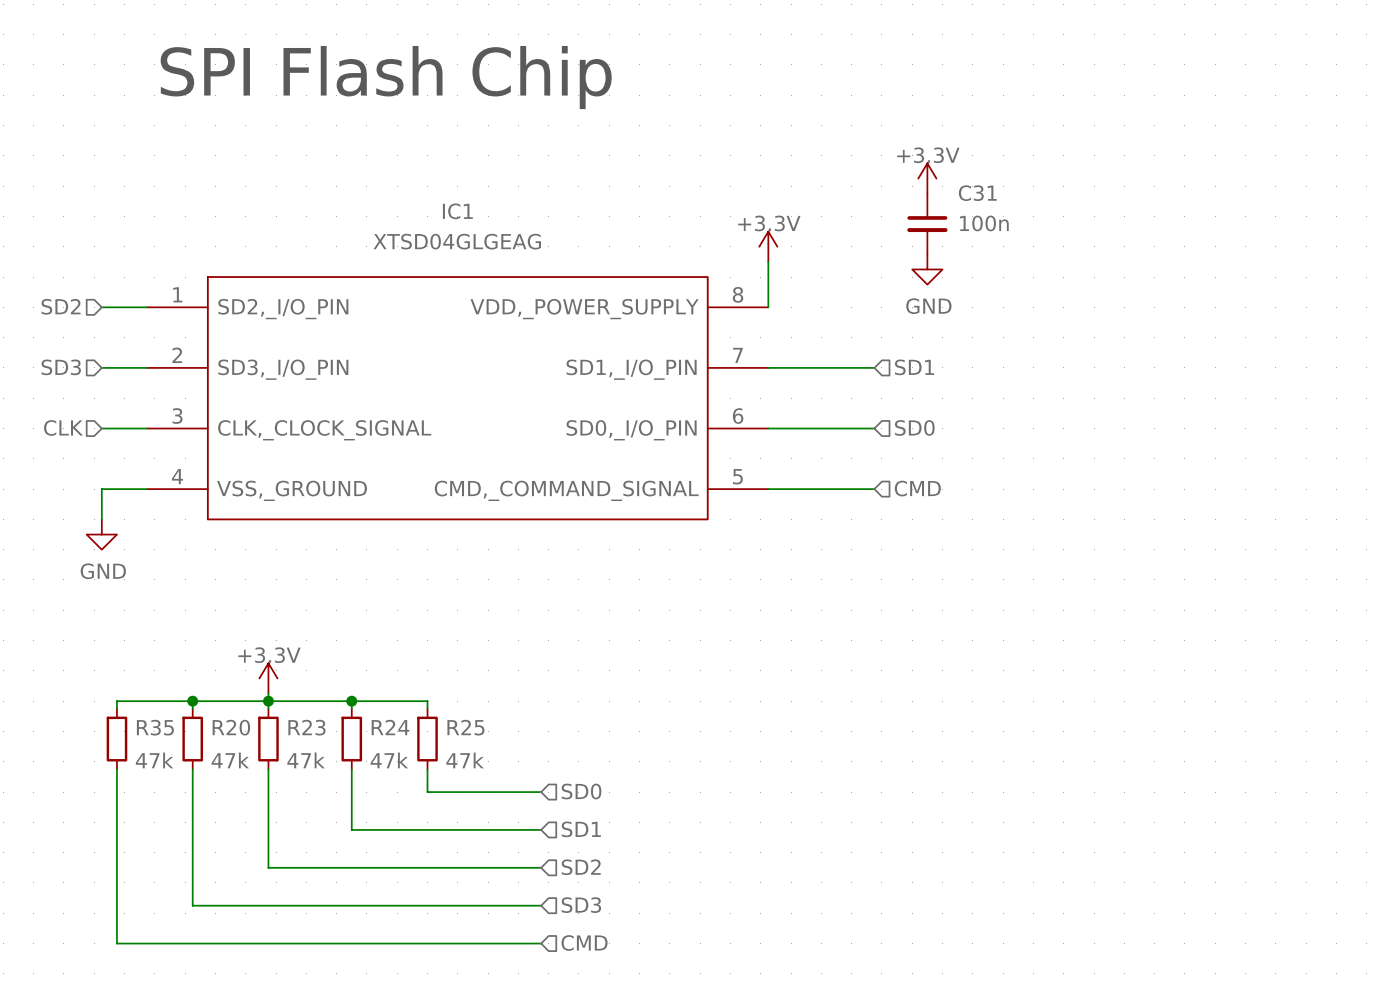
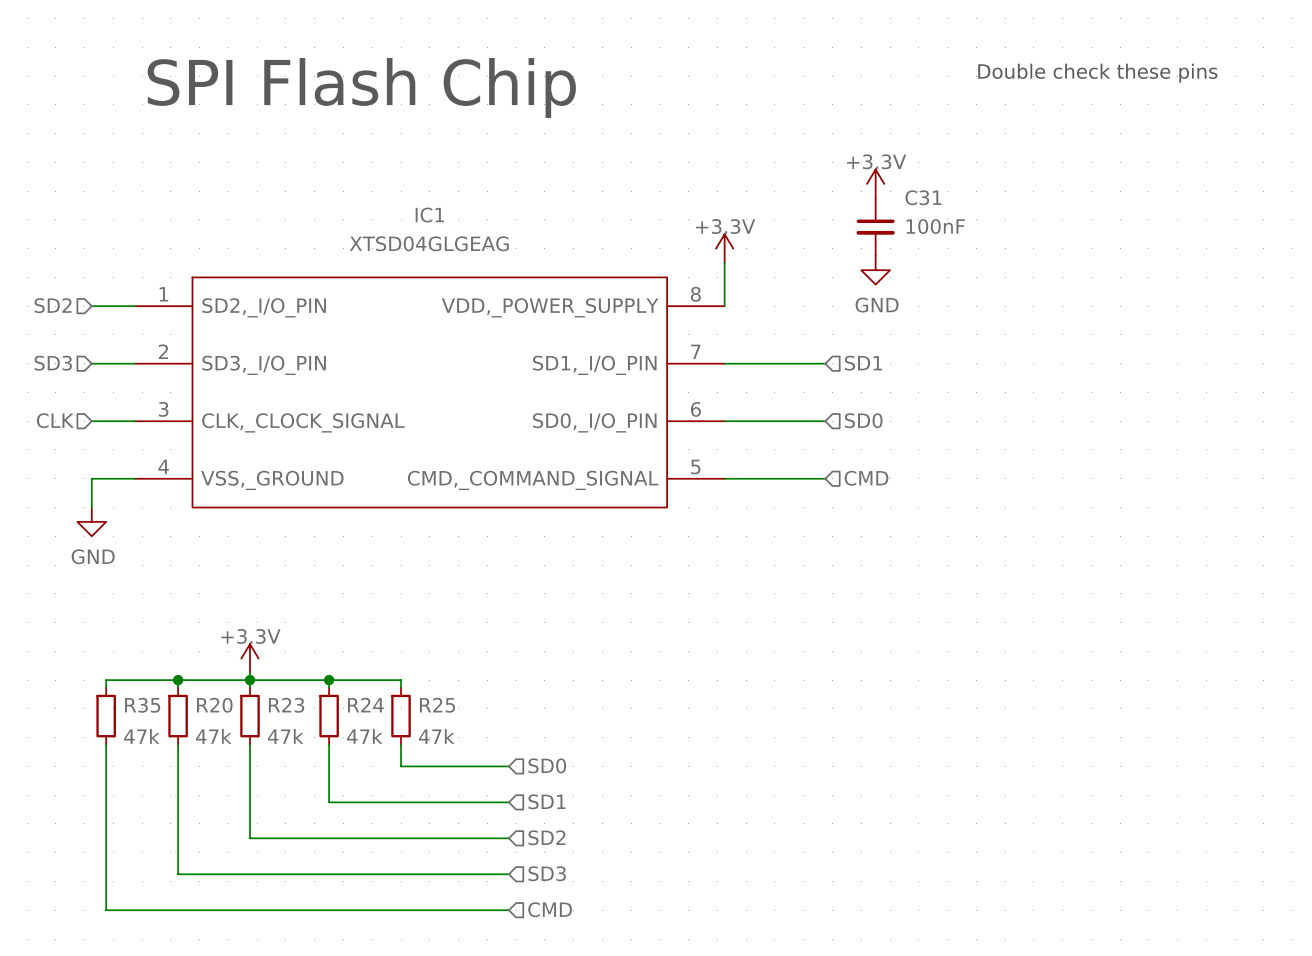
text: none -> Double check these pins (1097, 73)
C31 value: 100n (984, 223) -> 100nF (935, 226)

